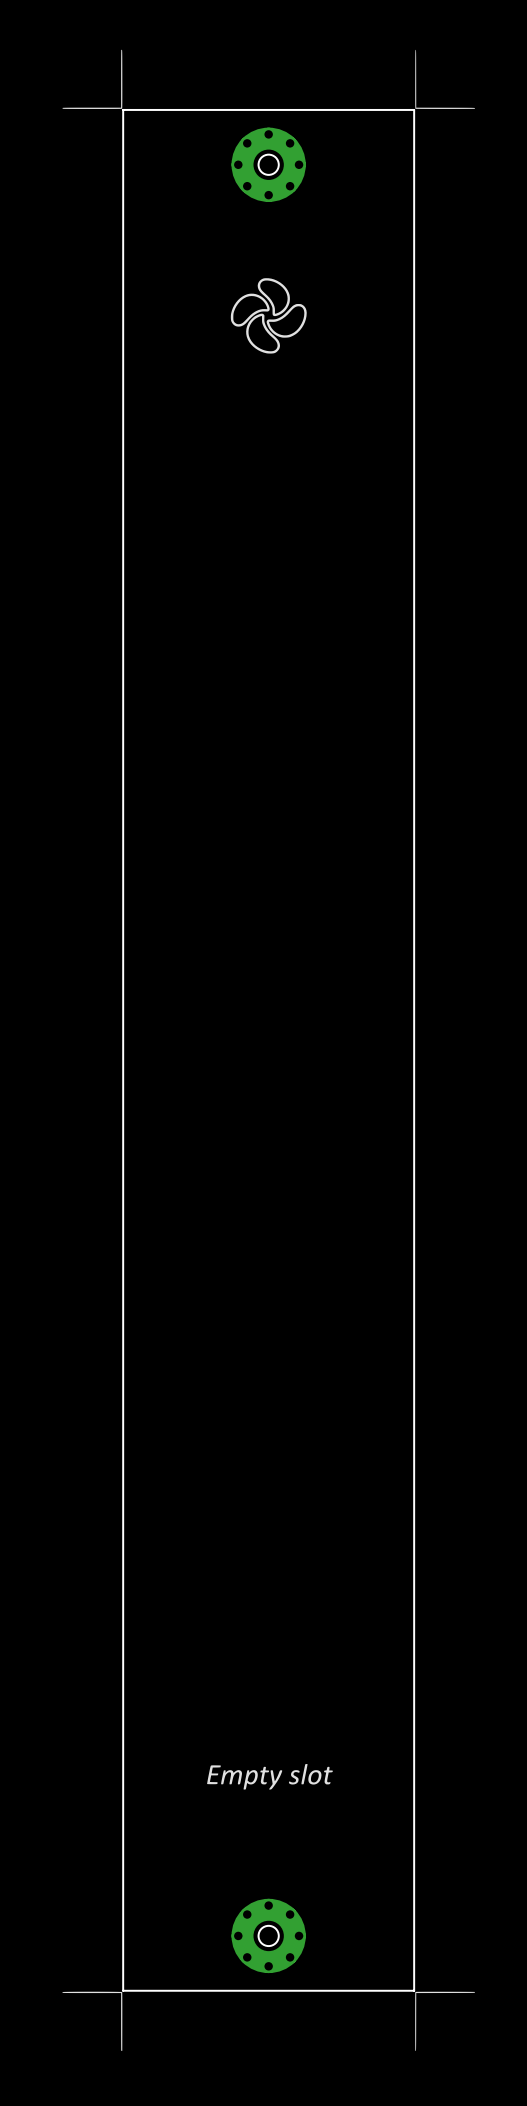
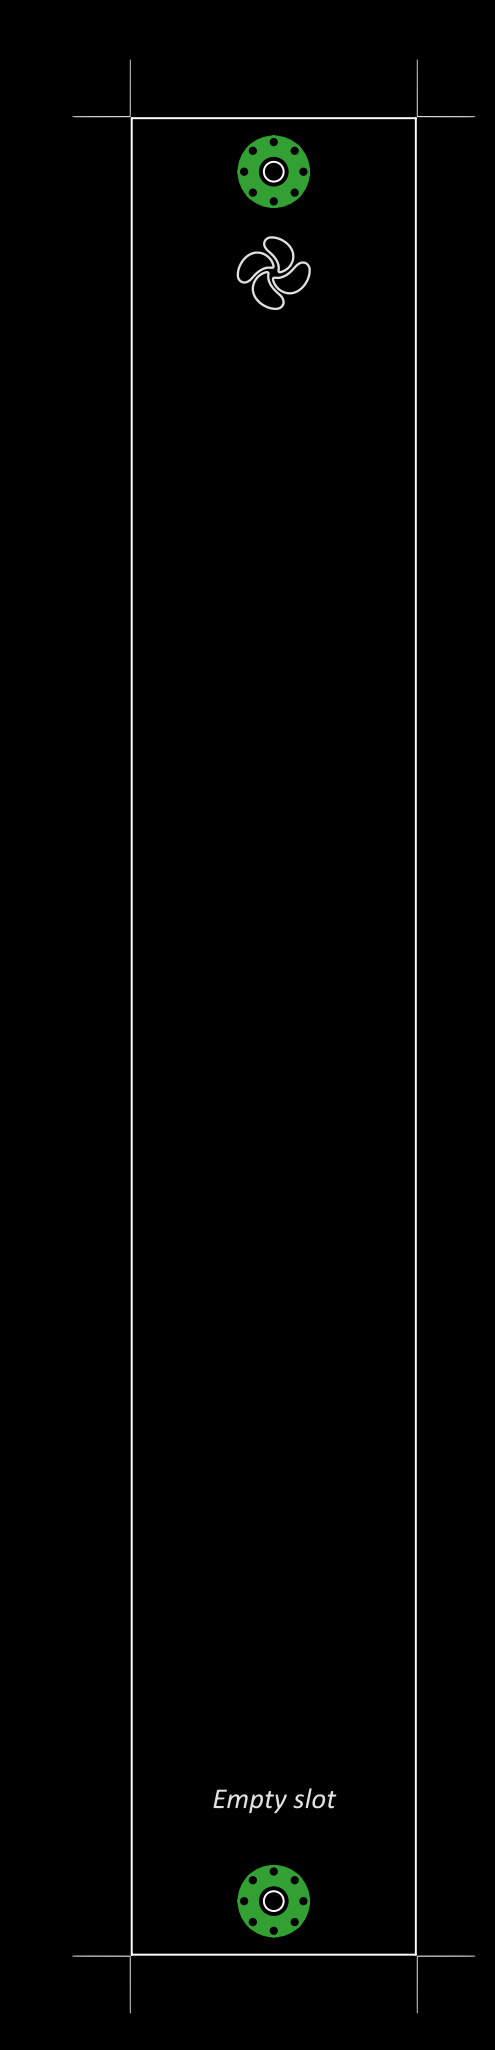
drawing shape: [62, 49, 475, 2051] -> [72, 59, 476, 2014]

